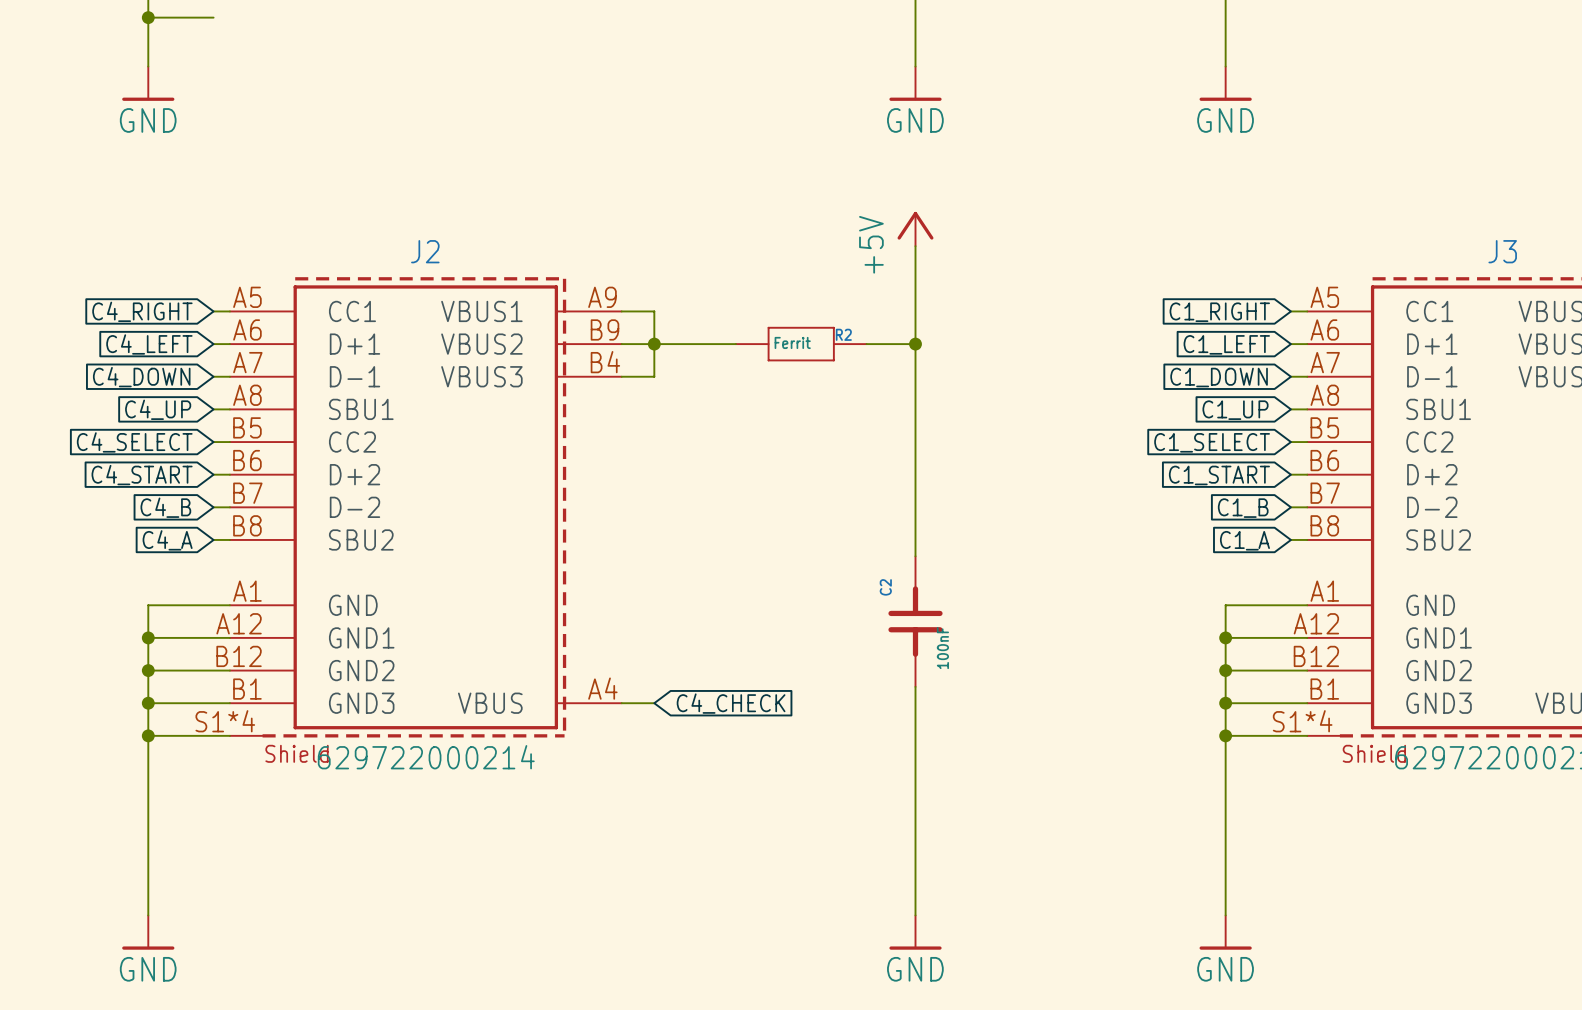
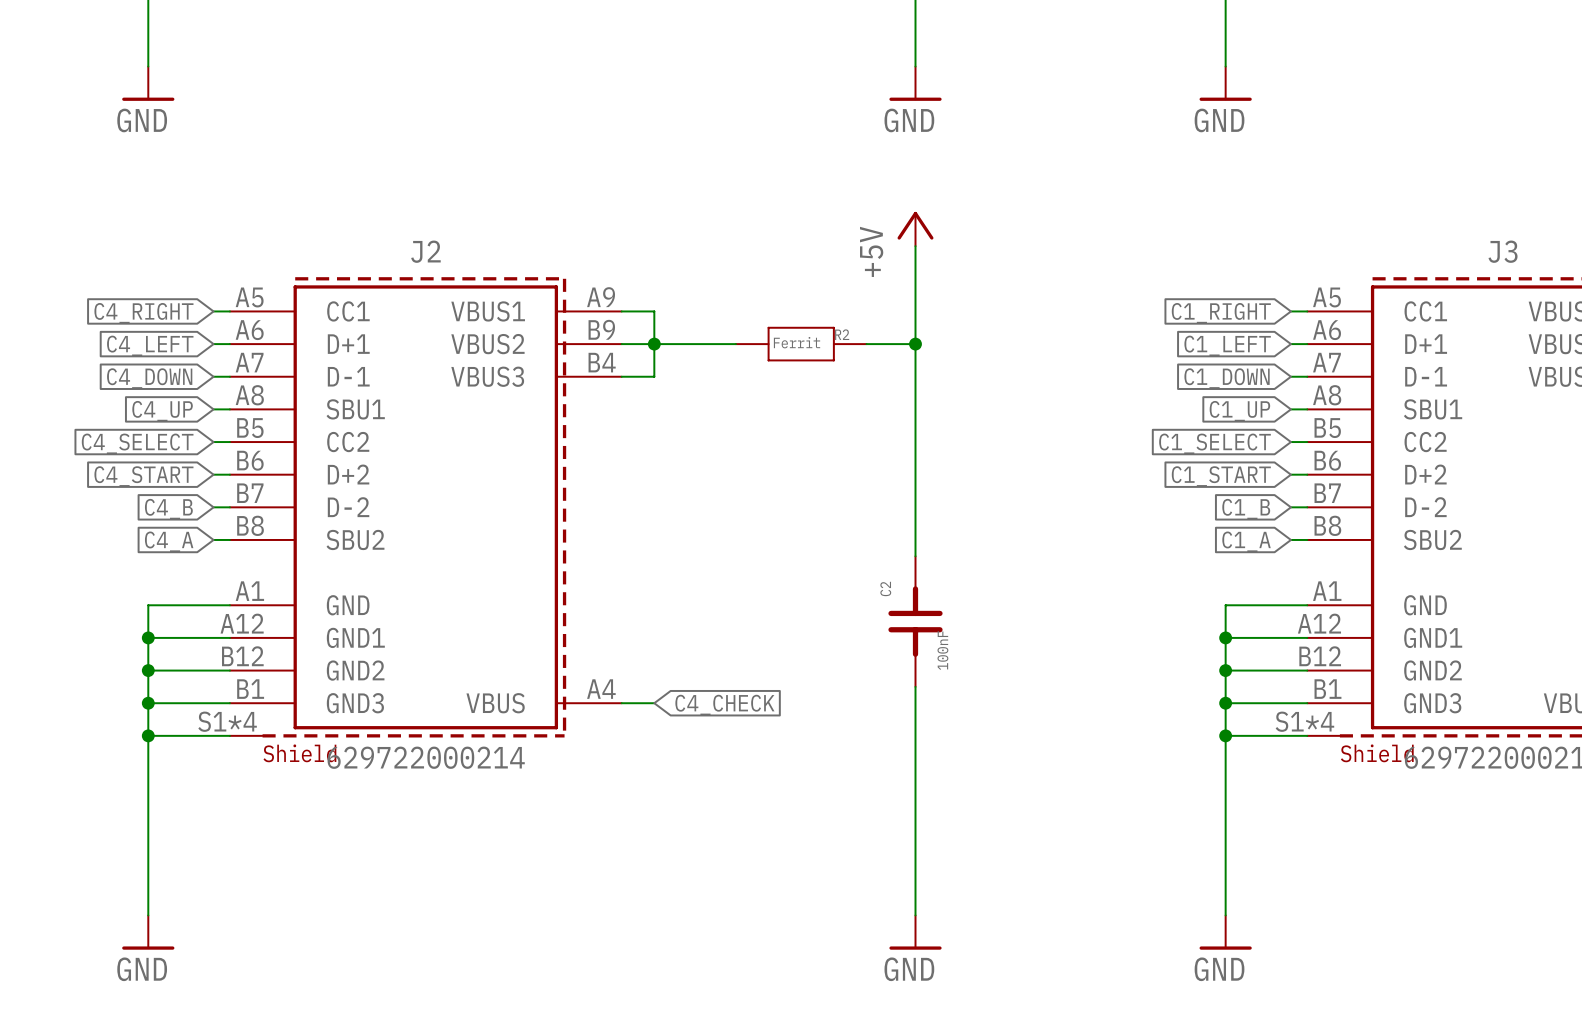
wire: (148, 17) (213, 17) -> none
junction: (148, 17) -> none

